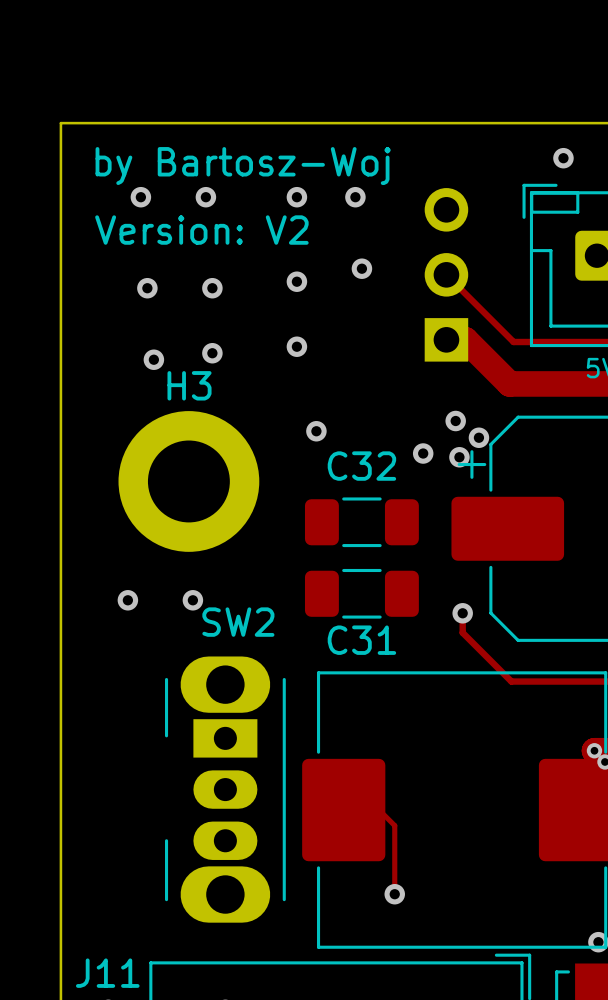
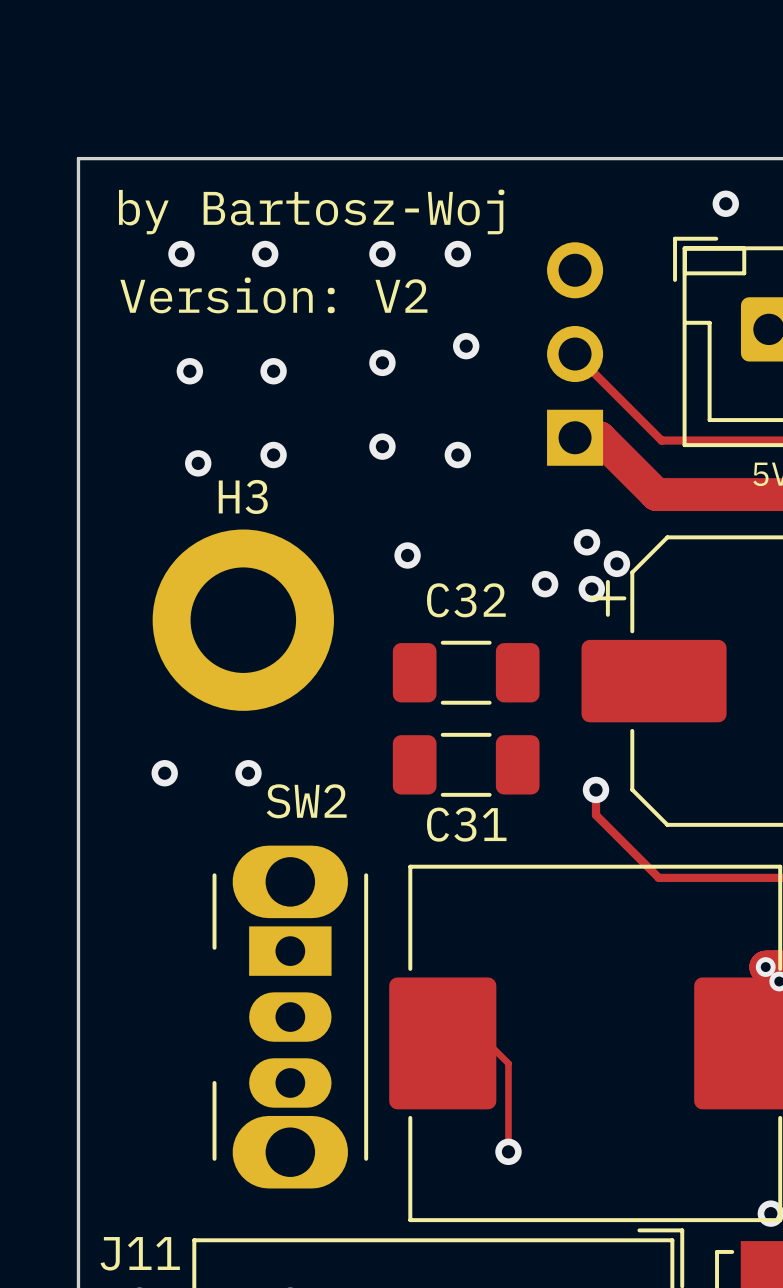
via: none -> (457, 455)

